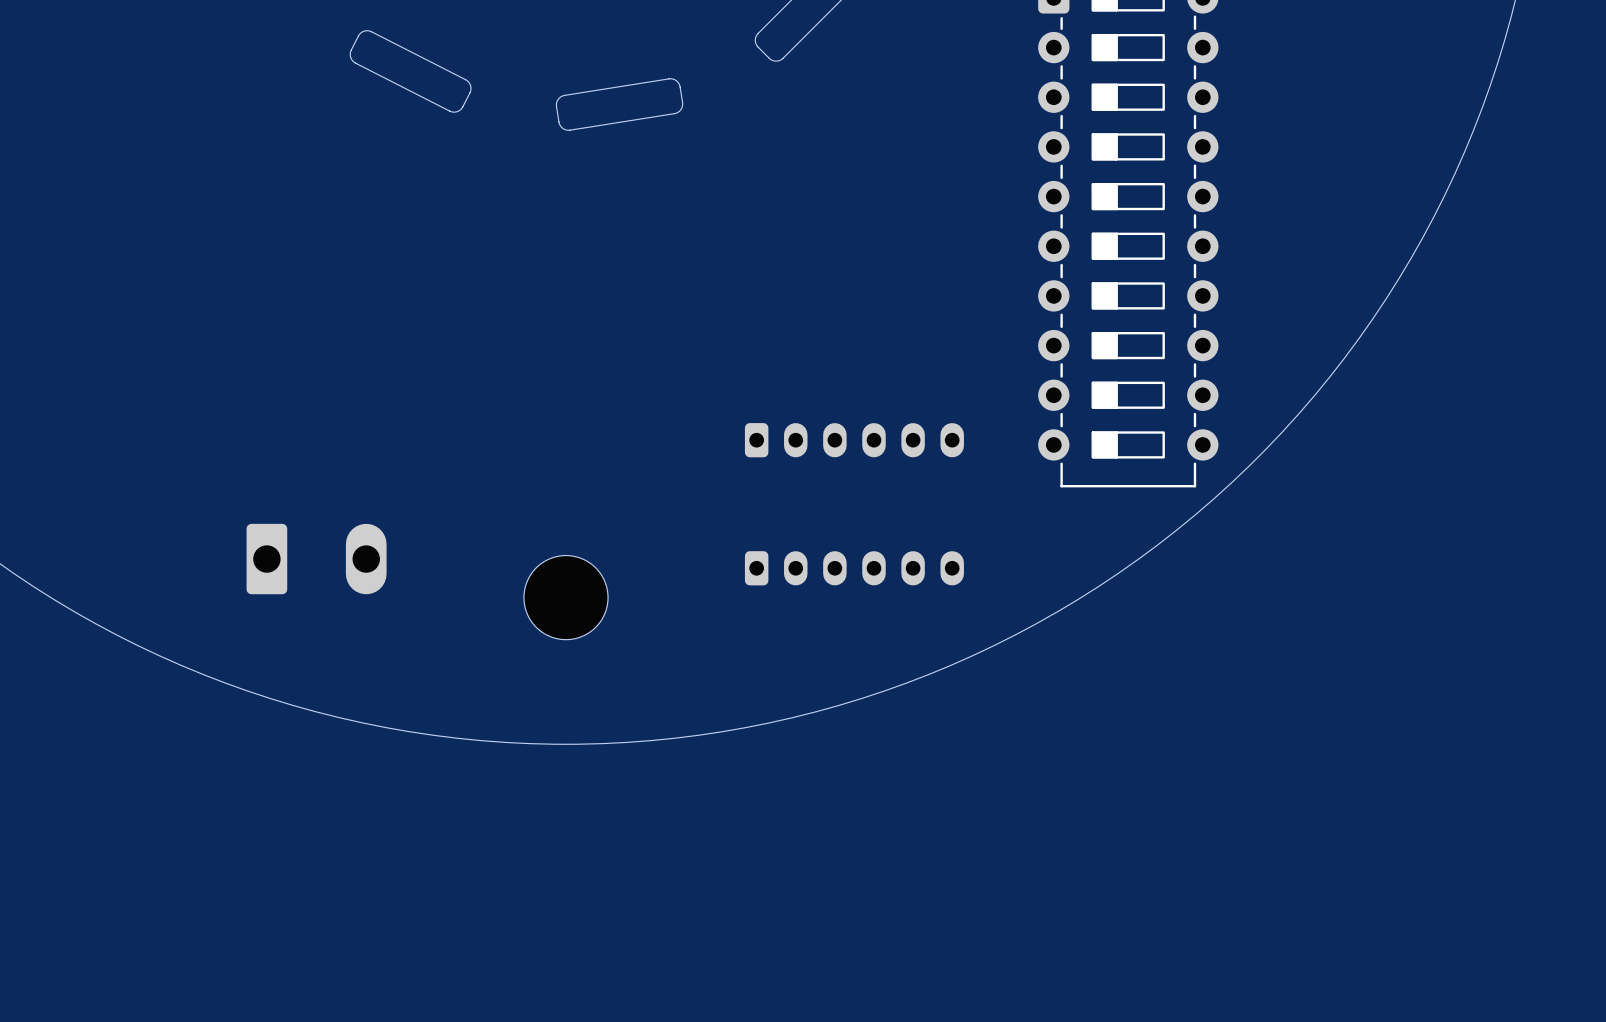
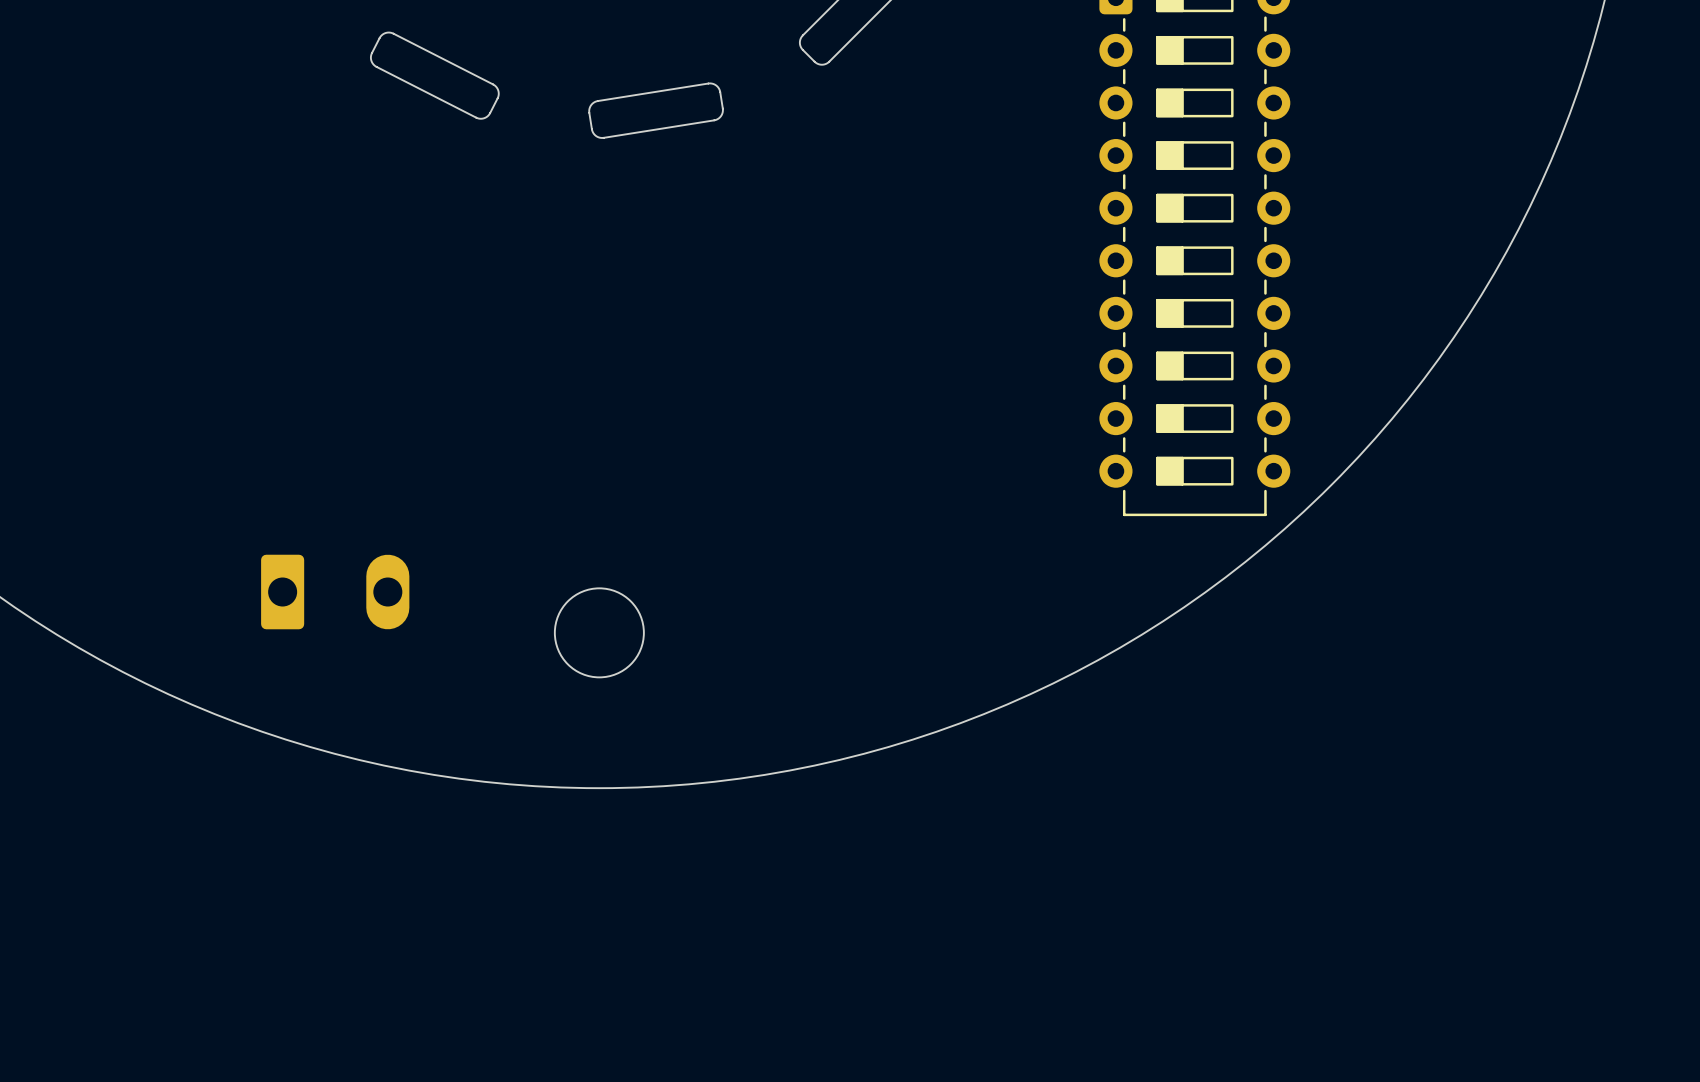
part: (854, 440) -> none
part: (854, 568) -> none

